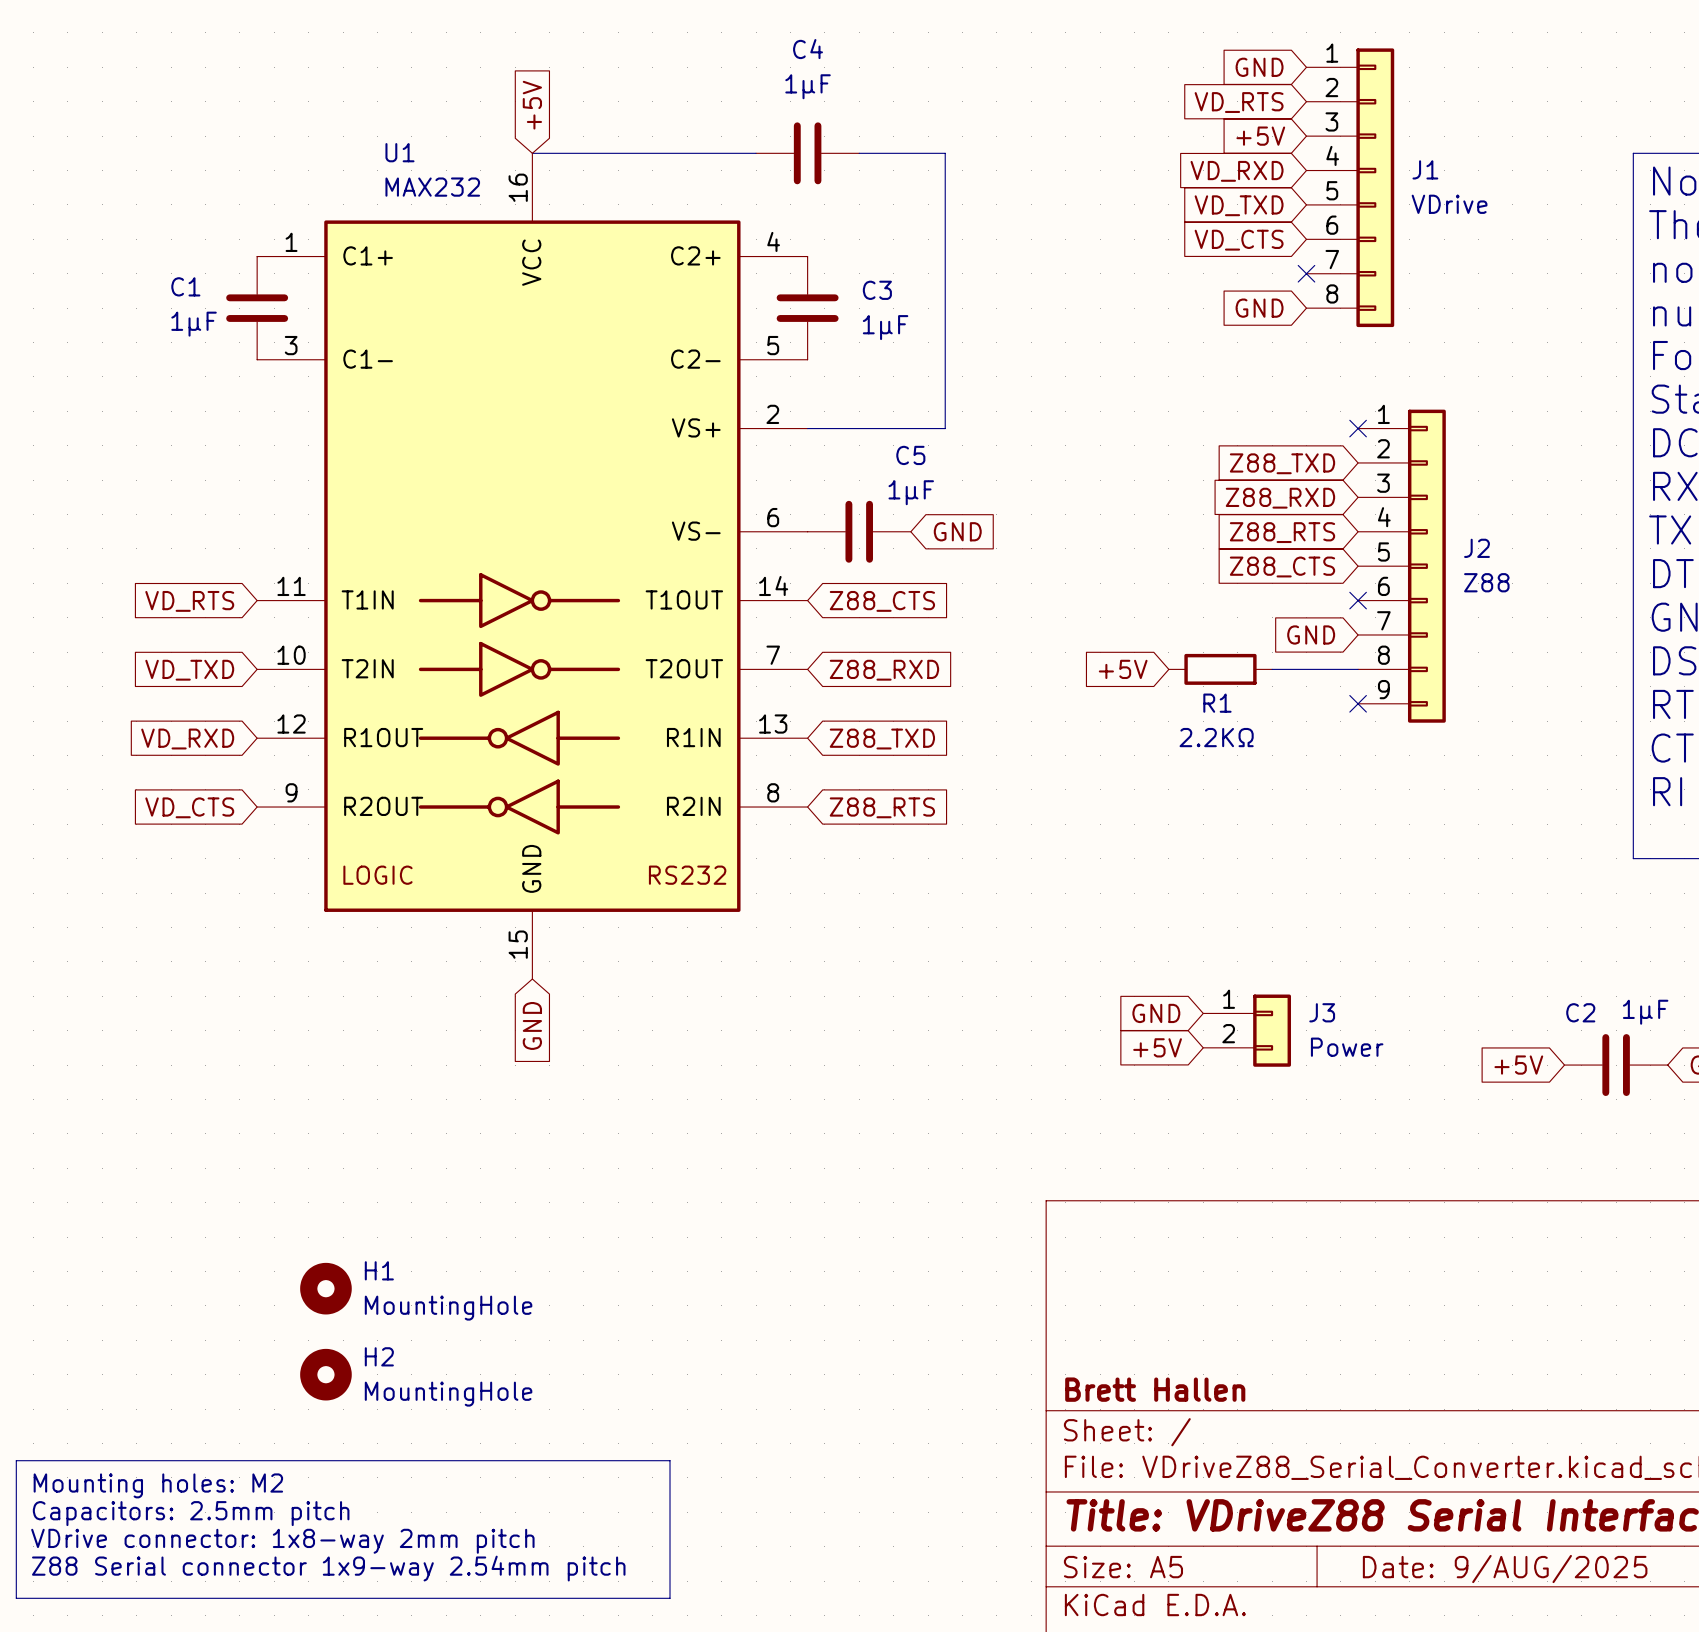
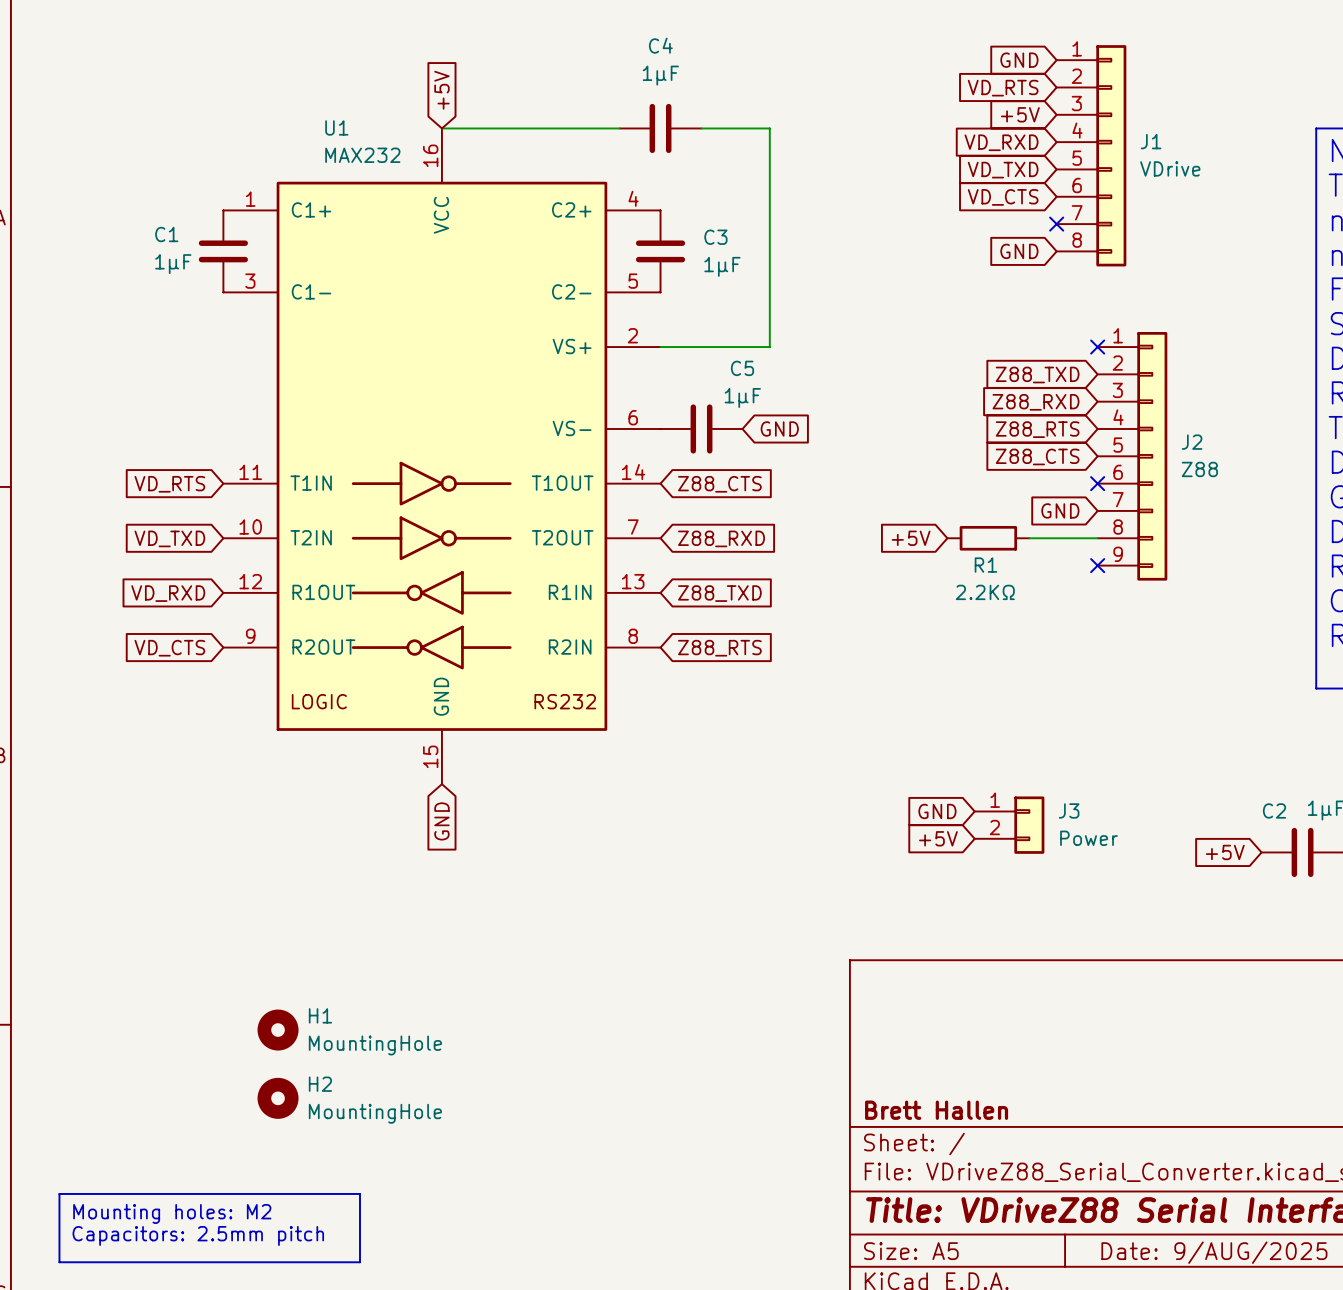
line: (16, 1460) (670, 1460) (670, 1598) (16, 1598) (16, 1460) -> none
text position: Mounting holes: M2 (158, 1485) -> Mounting holes: M2 (172, 1213)
line: none -> (59, 1193) (359, 1193) (359, 1262) (59, 1262) (59, 1193)
text position: Capacitors: 2.5mm pitch (191, 1513) -> Capacitors: 2.5mm pitch (198, 1235)
text: VDrive connector: 1x8-way 2mm pitch (282, 1541) -> none
text: Z88 Serial connector 1x9-way 2.54mm pitch (328, 1568) -> none

